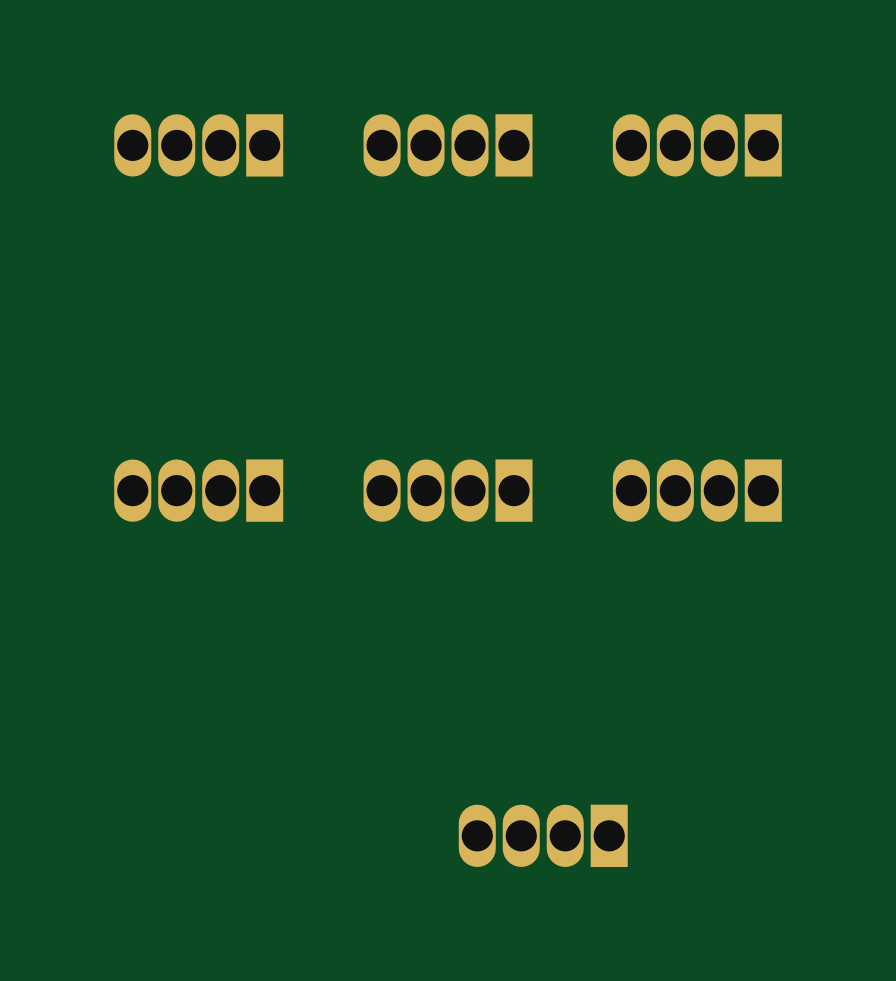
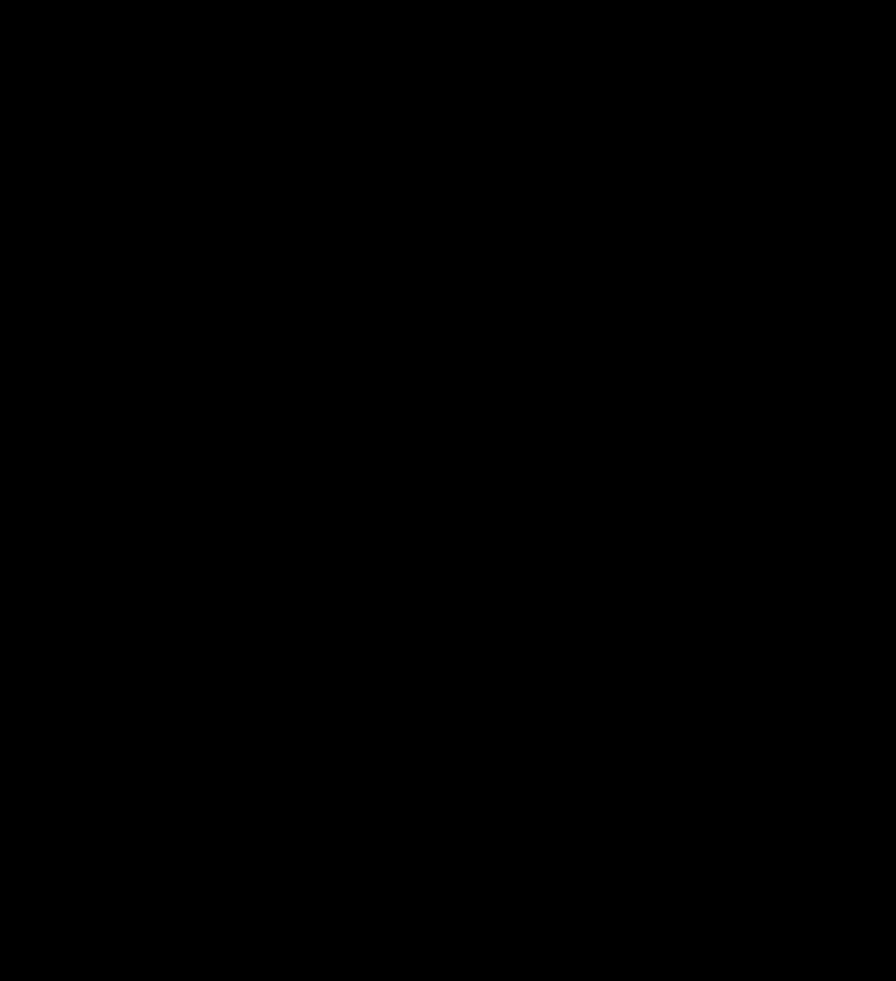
part: (198, 145) -> none
part: (448, 145) -> none
part: (697, 145) -> none
part: (198, 490) -> none
part: (448, 490) -> none
part: (697, 490) -> none
part: (543, 835) -> none

